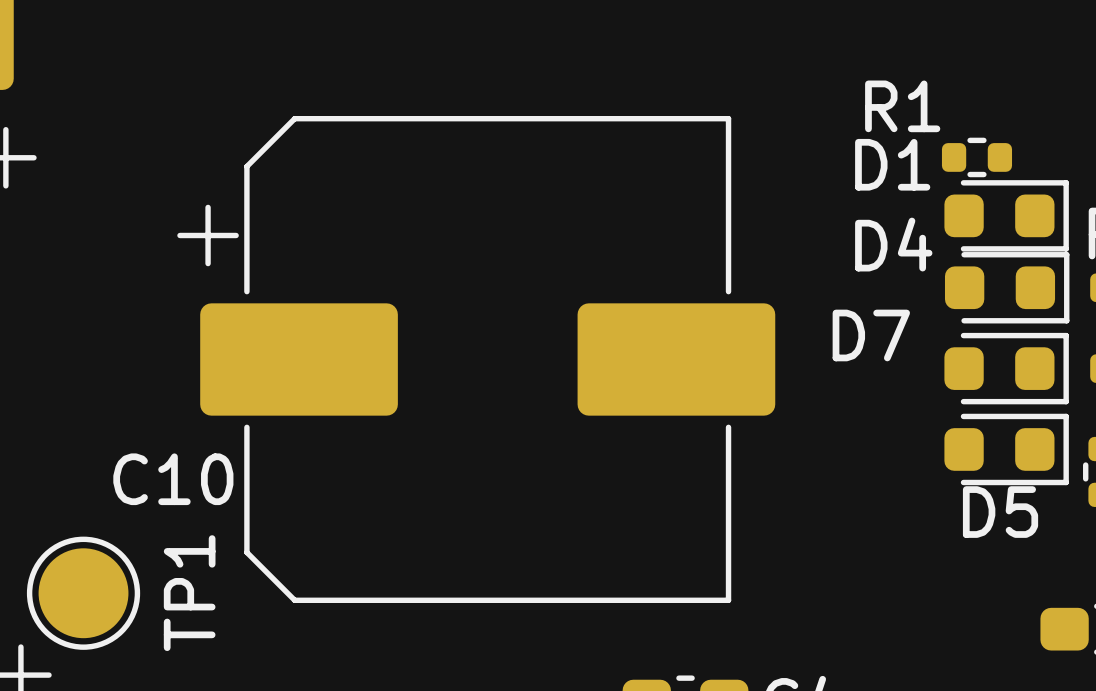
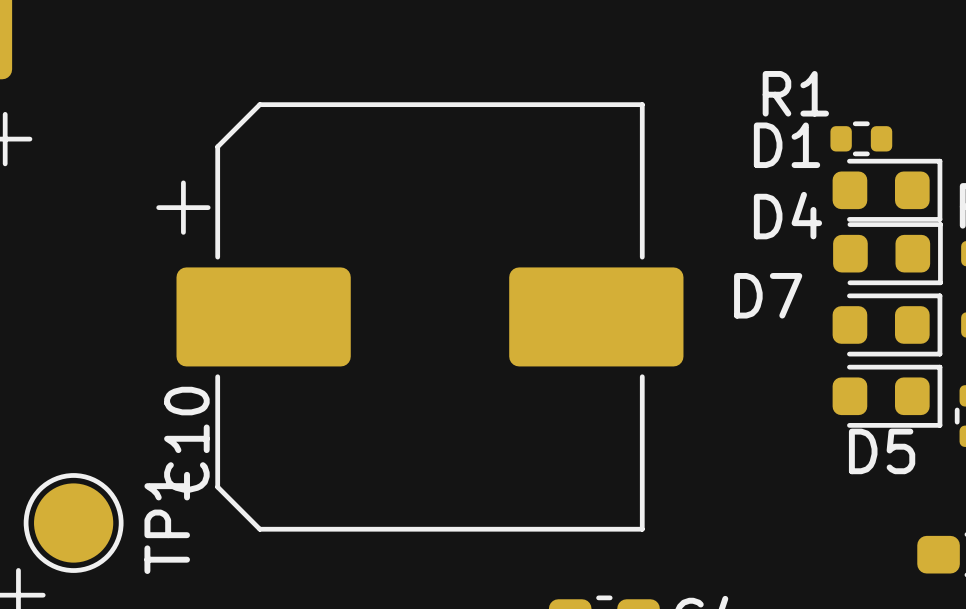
C10 name rotation: 0° (173, 479) -> 90° counterclockwise (186, 439)

